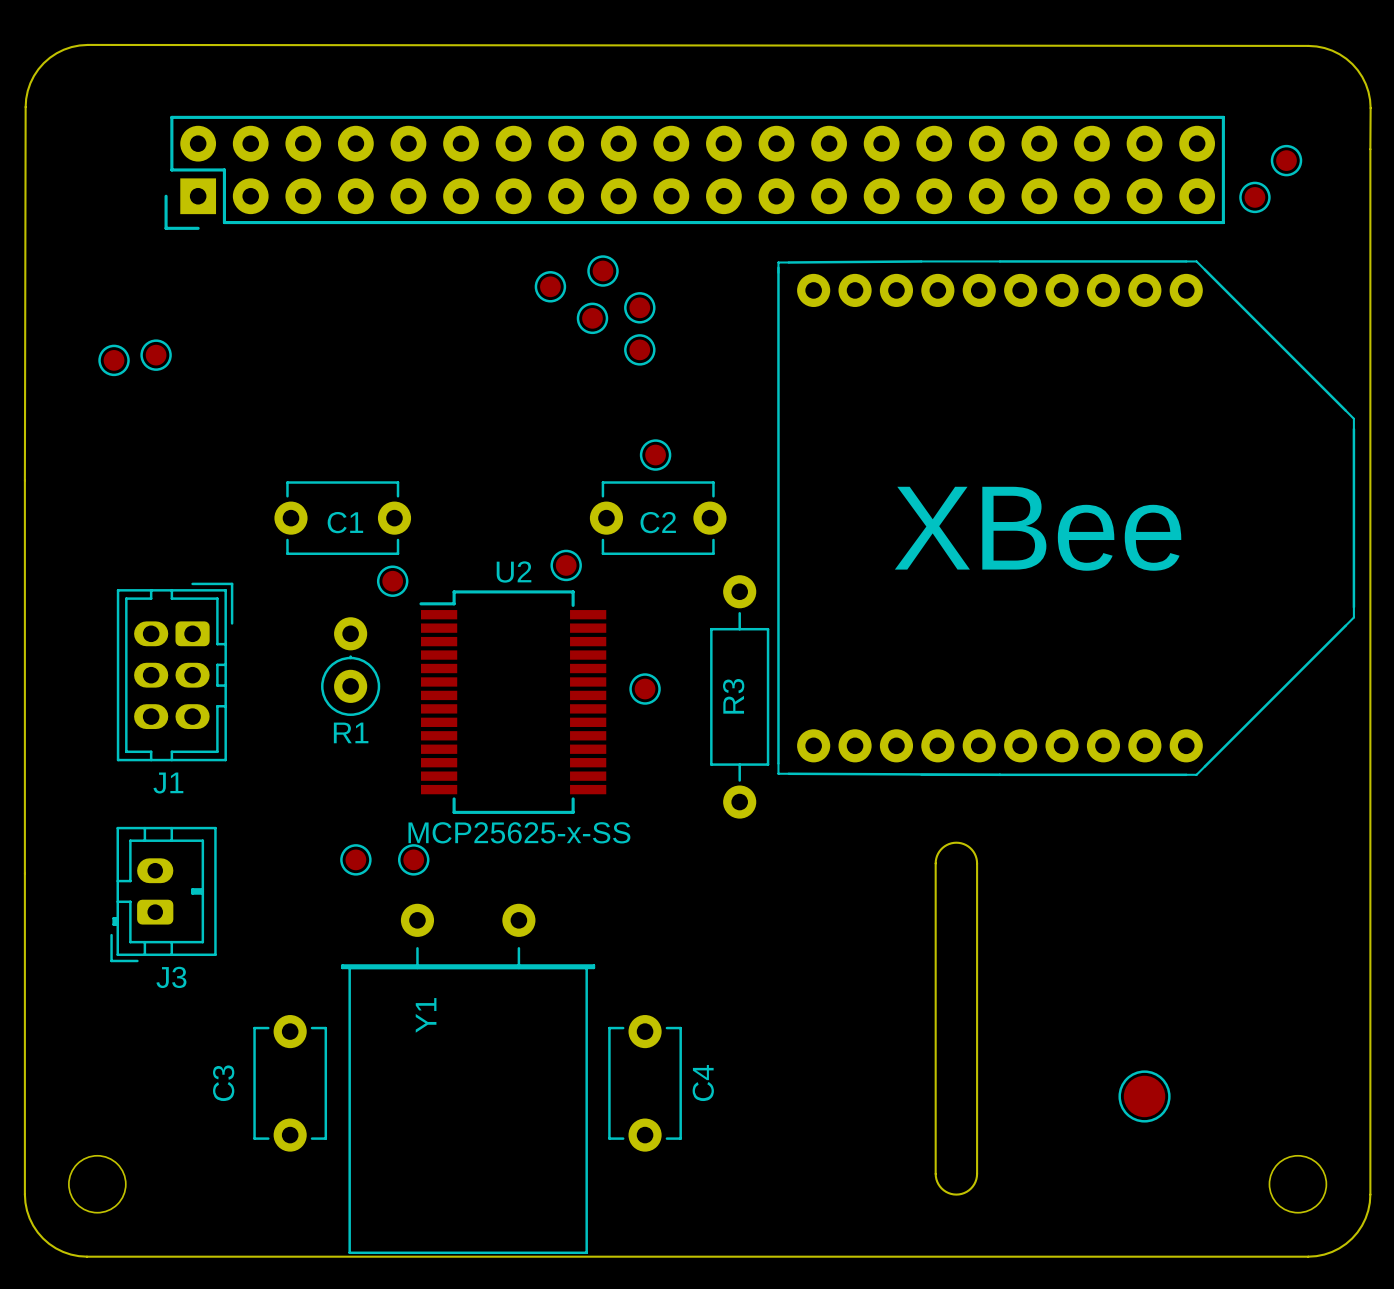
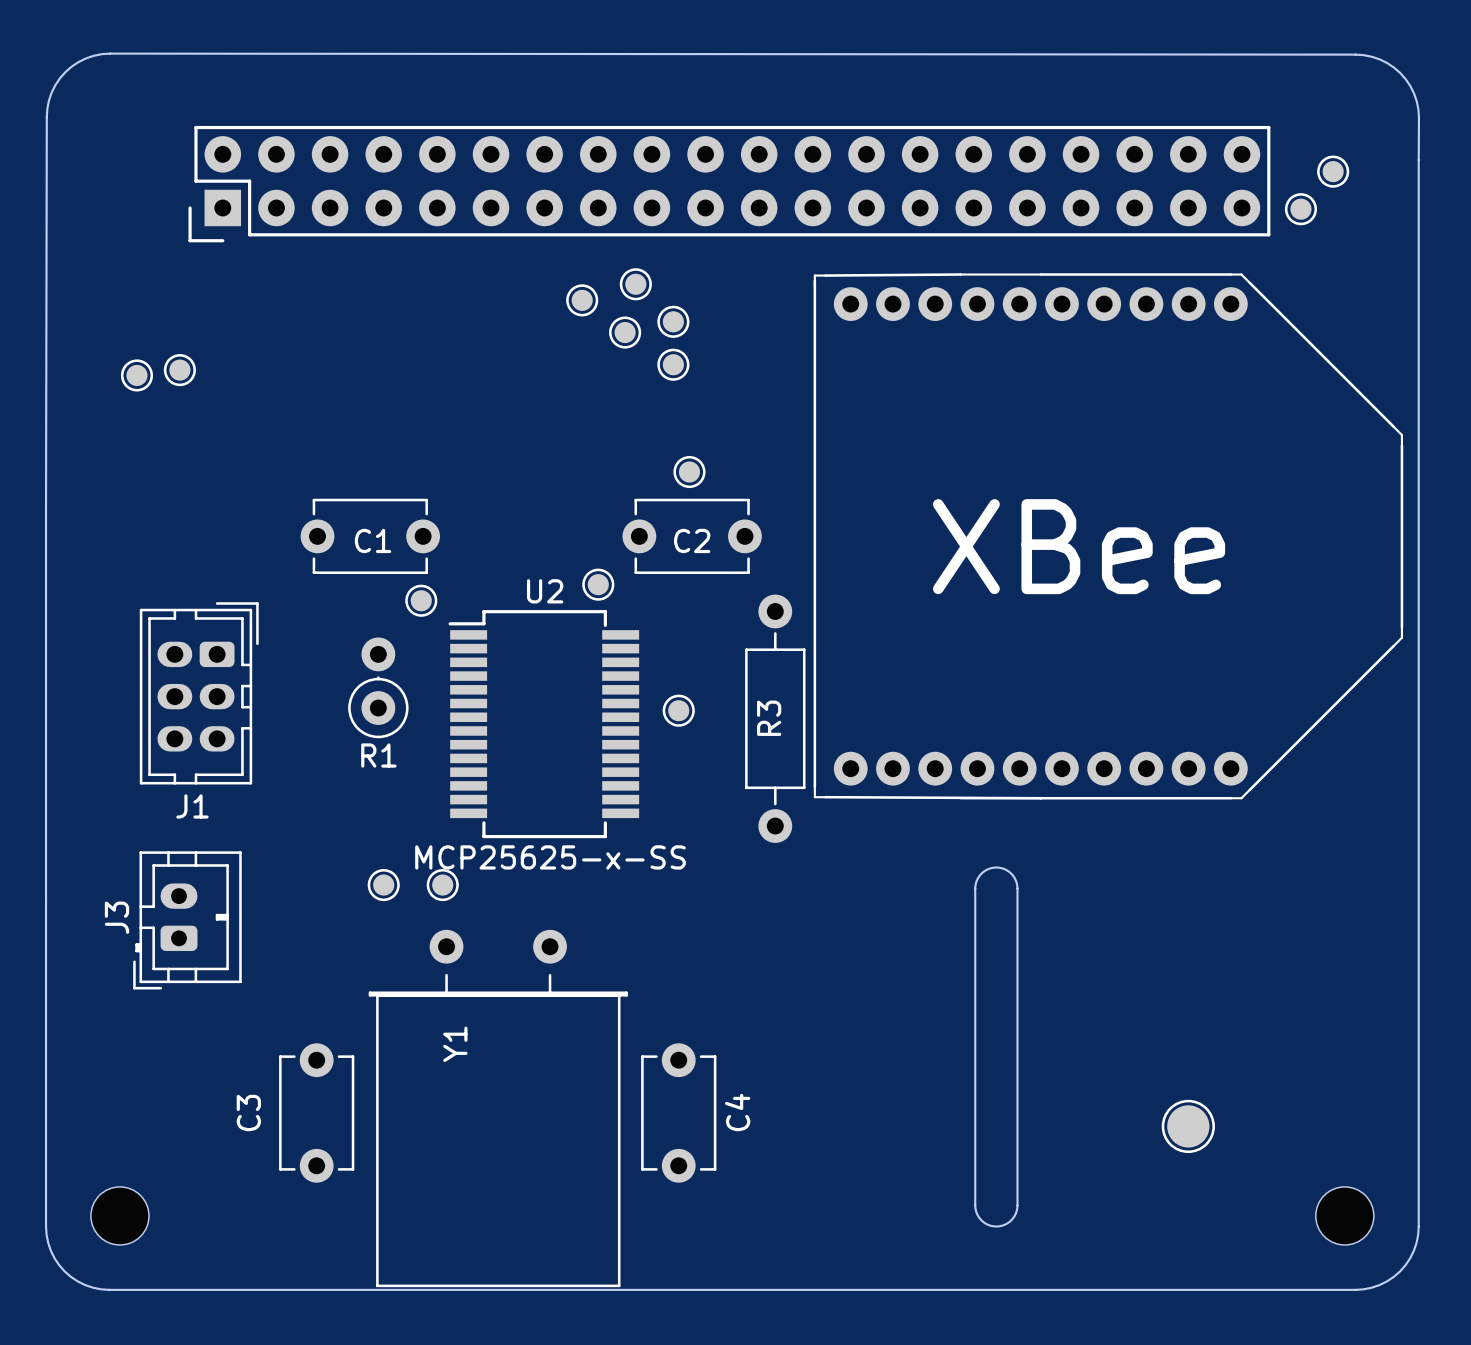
J3 name rotation: 0° (171, 977) -> 90° counterclockwise (116, 917)
J3 name position: J3 (171, 977) -> J3 (116, 917)

